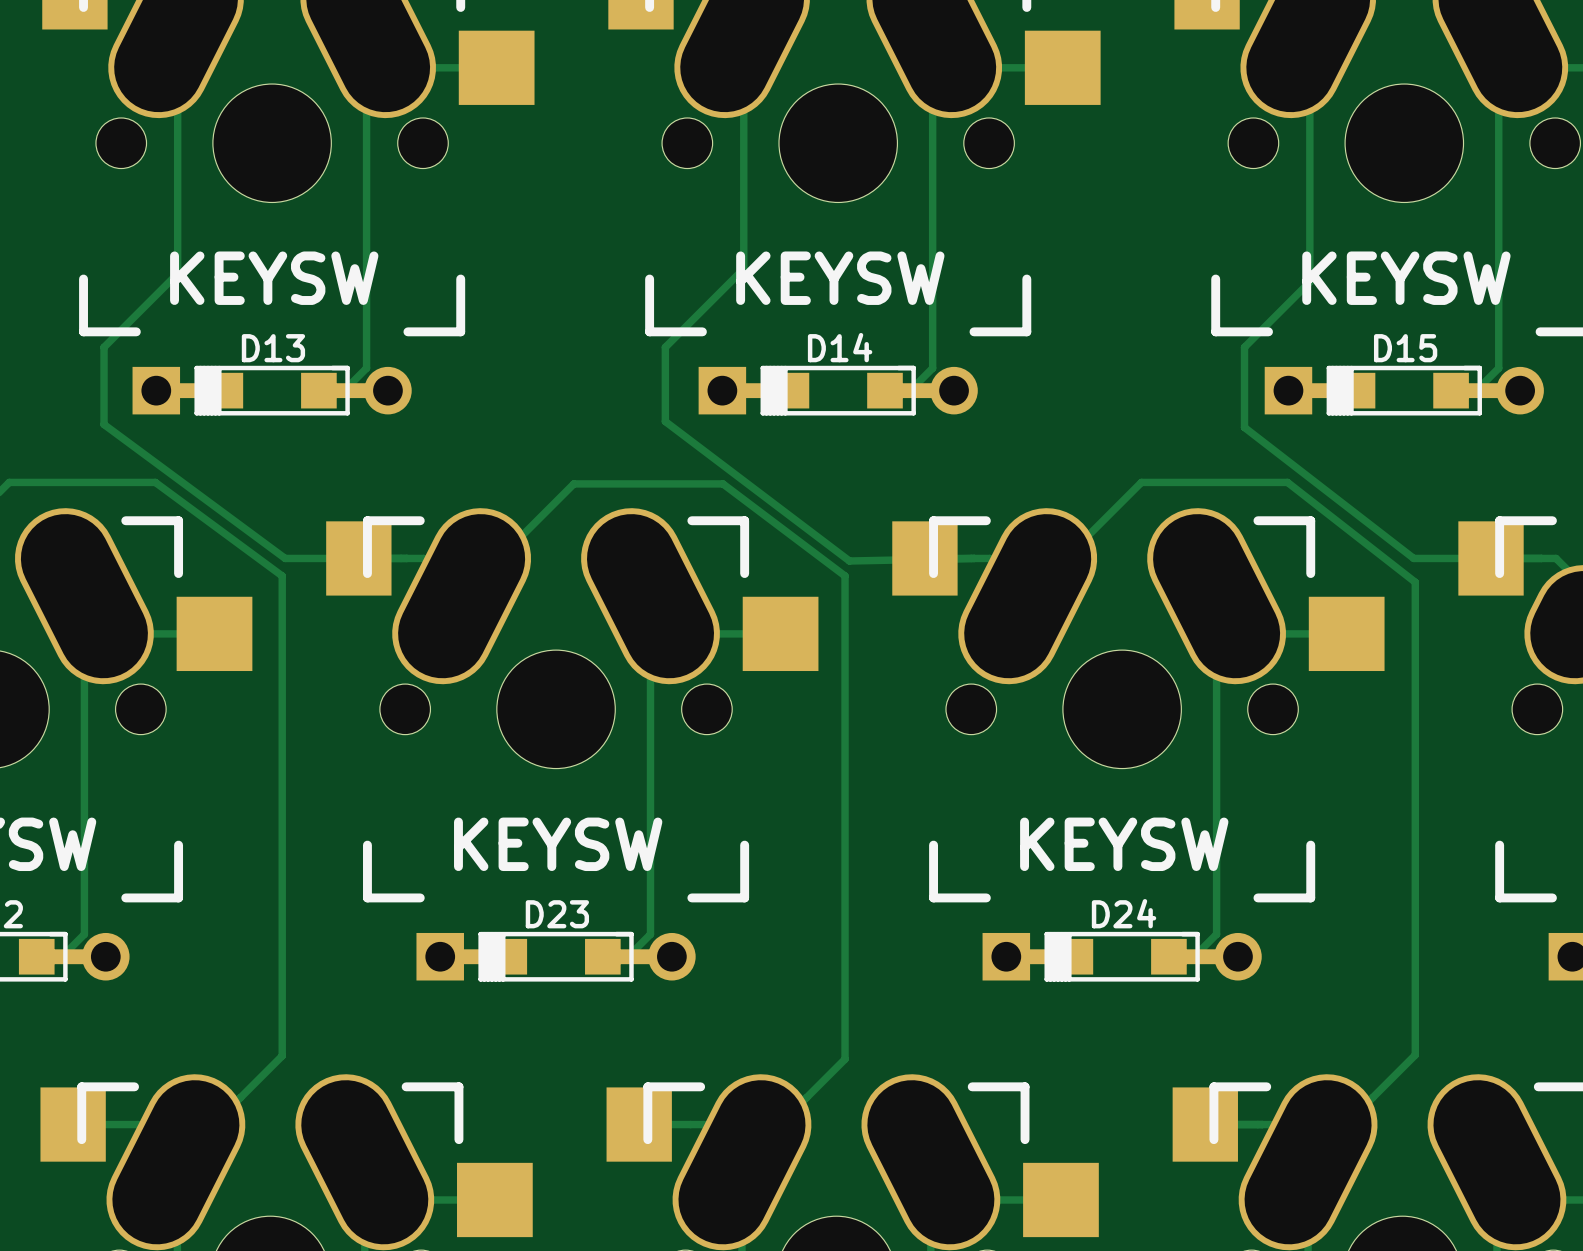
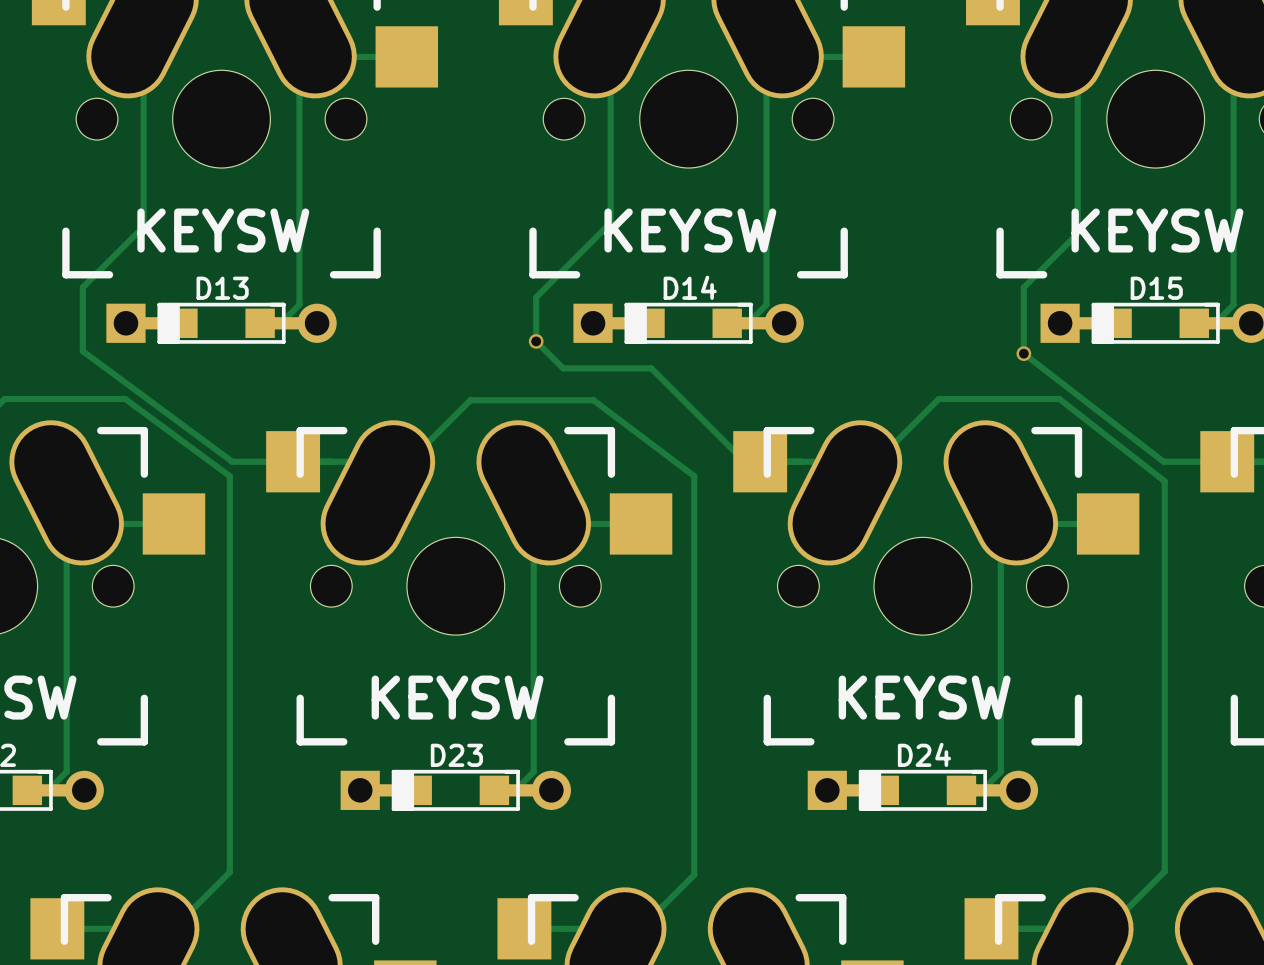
track: (665, 347) (665, 421) (849, 561) (974, 558) -> (545, 287) (536, 297) (536, 341) (563, 368) (651, 368) (744, 461) (760, 461)
via: none -> (536, 341)
via: none -> (1023, 353)

